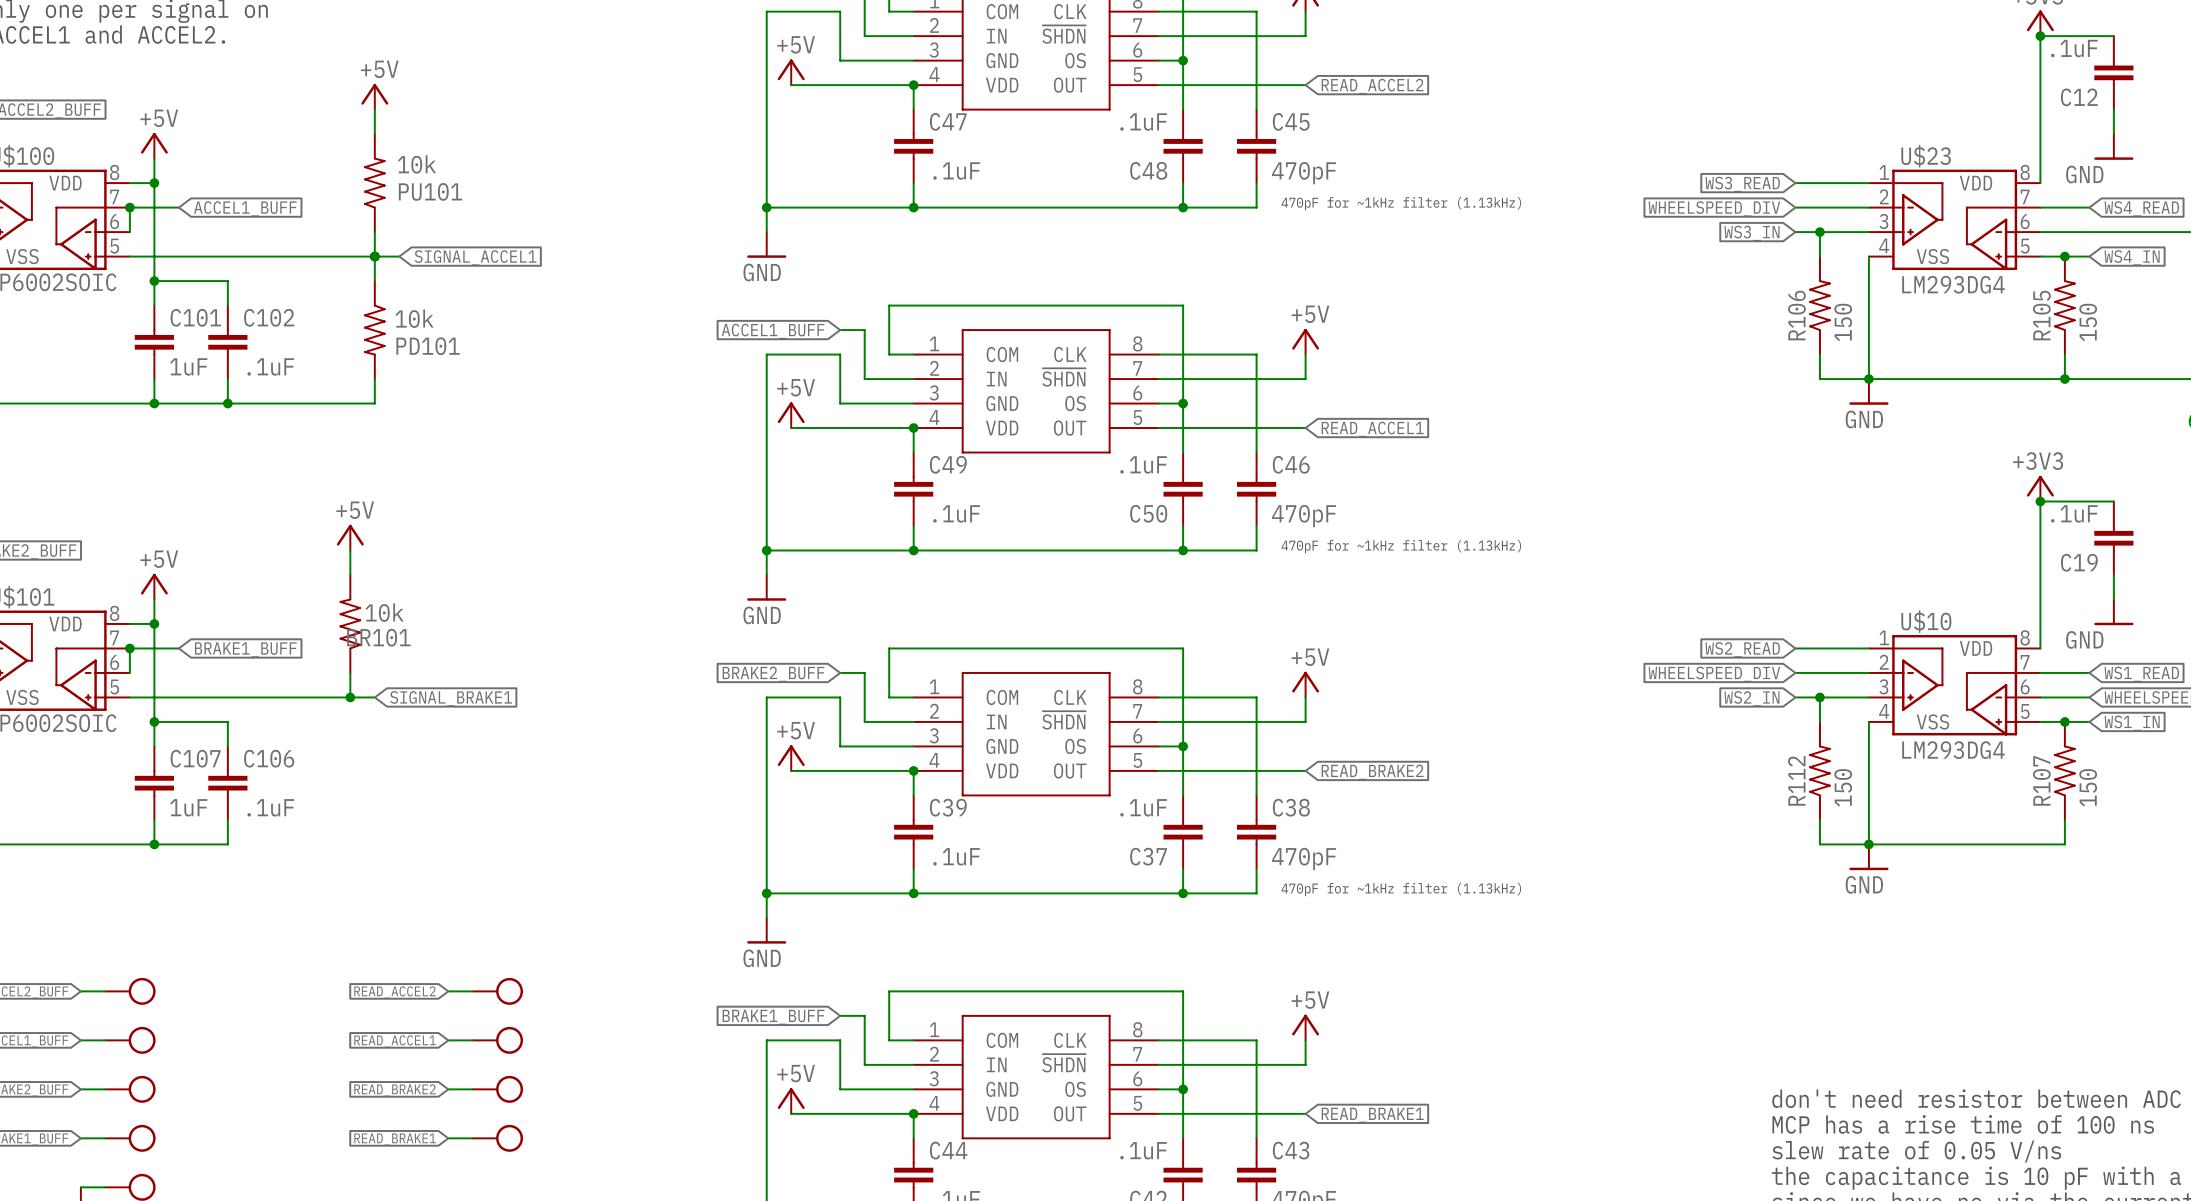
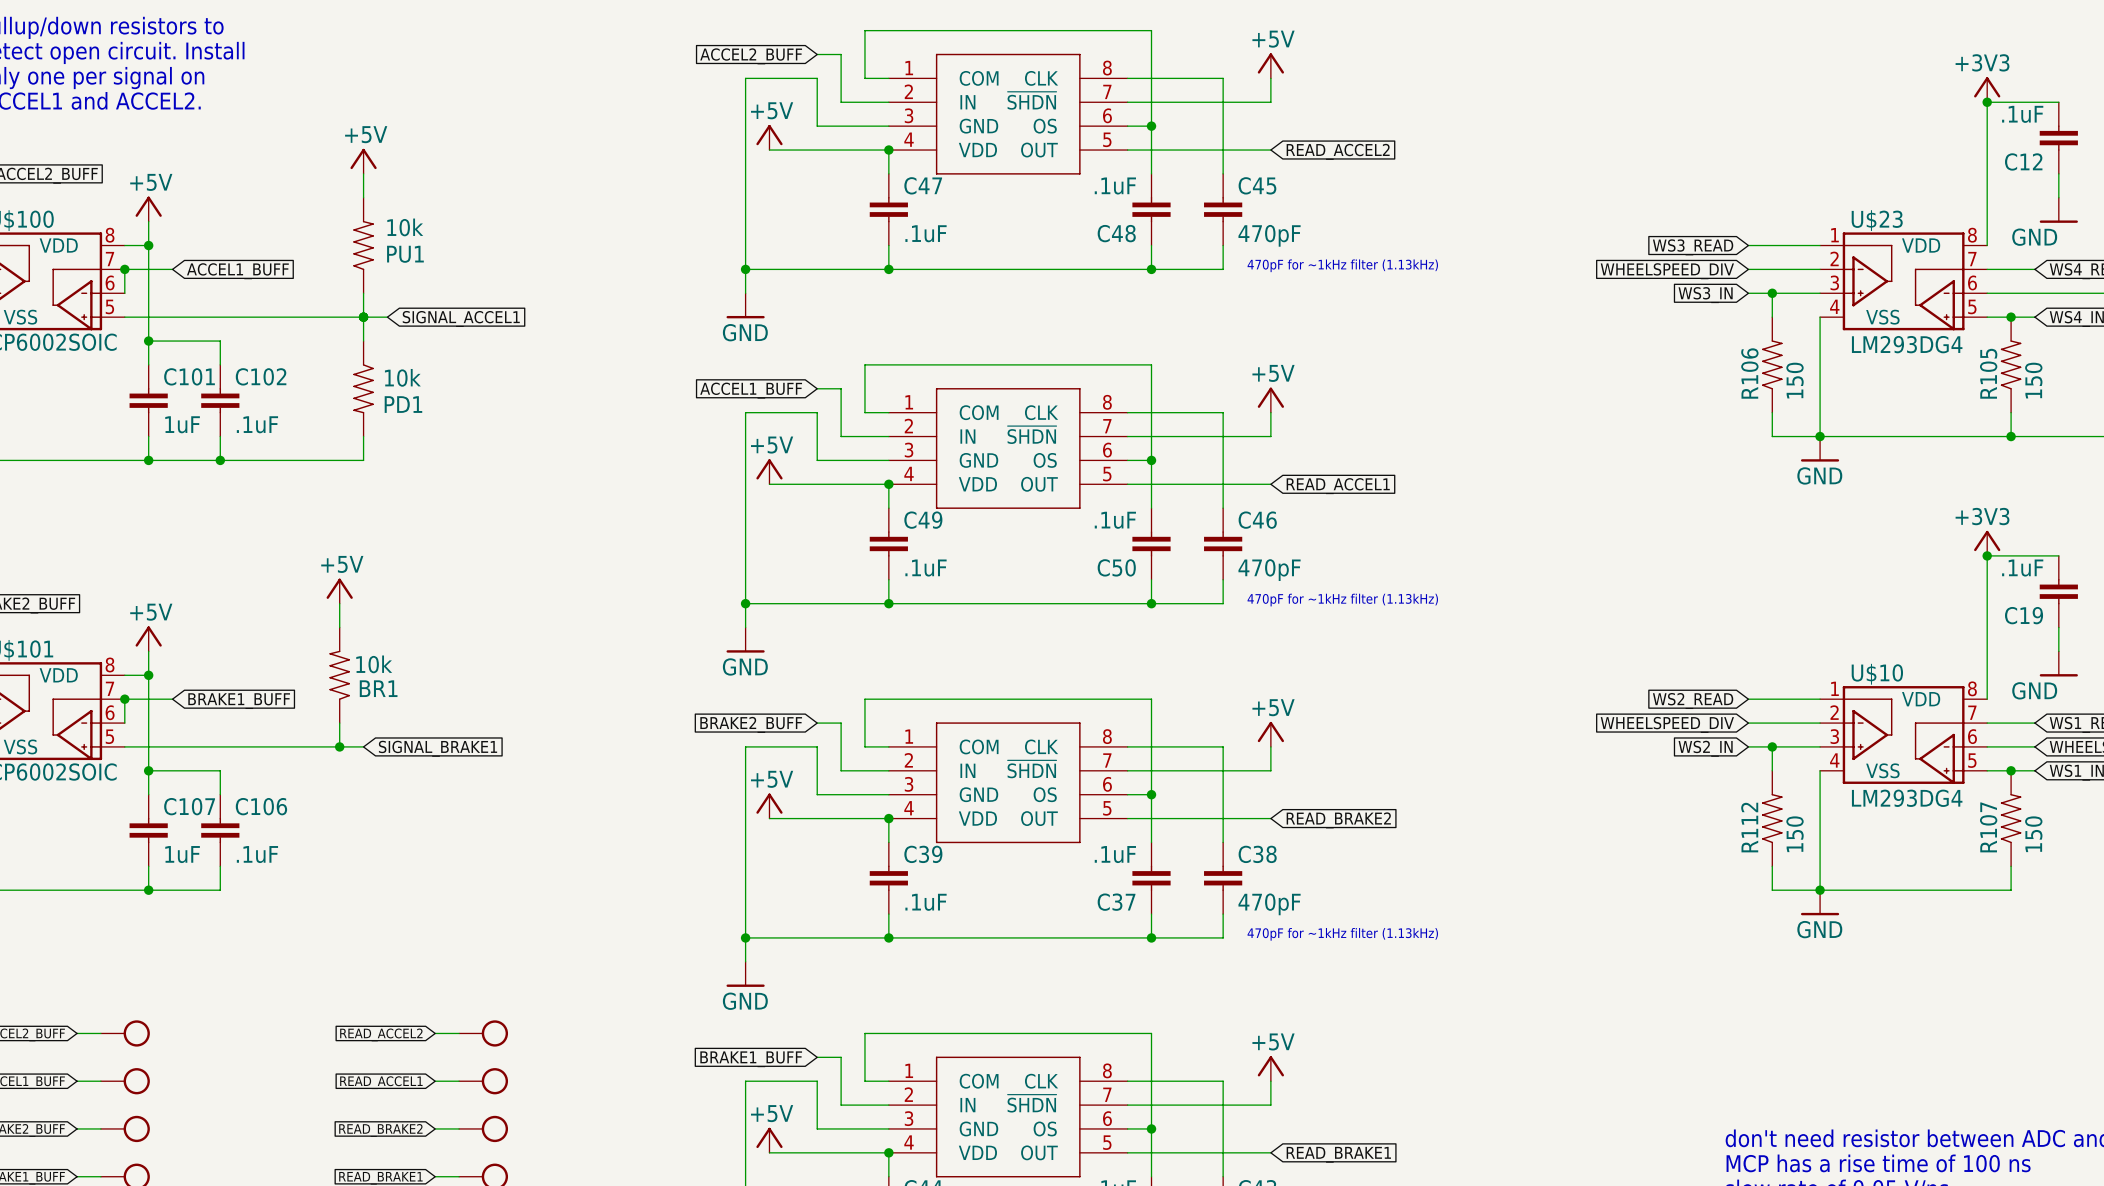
PU101 name: PU101 (430, 191) -> PU1 (405, 254)
PD101 name: PD101 (428, 346) -> PD1 (403, 404)
BR101 name: BR101 (378, 637) -> BR1 (378, 688)

